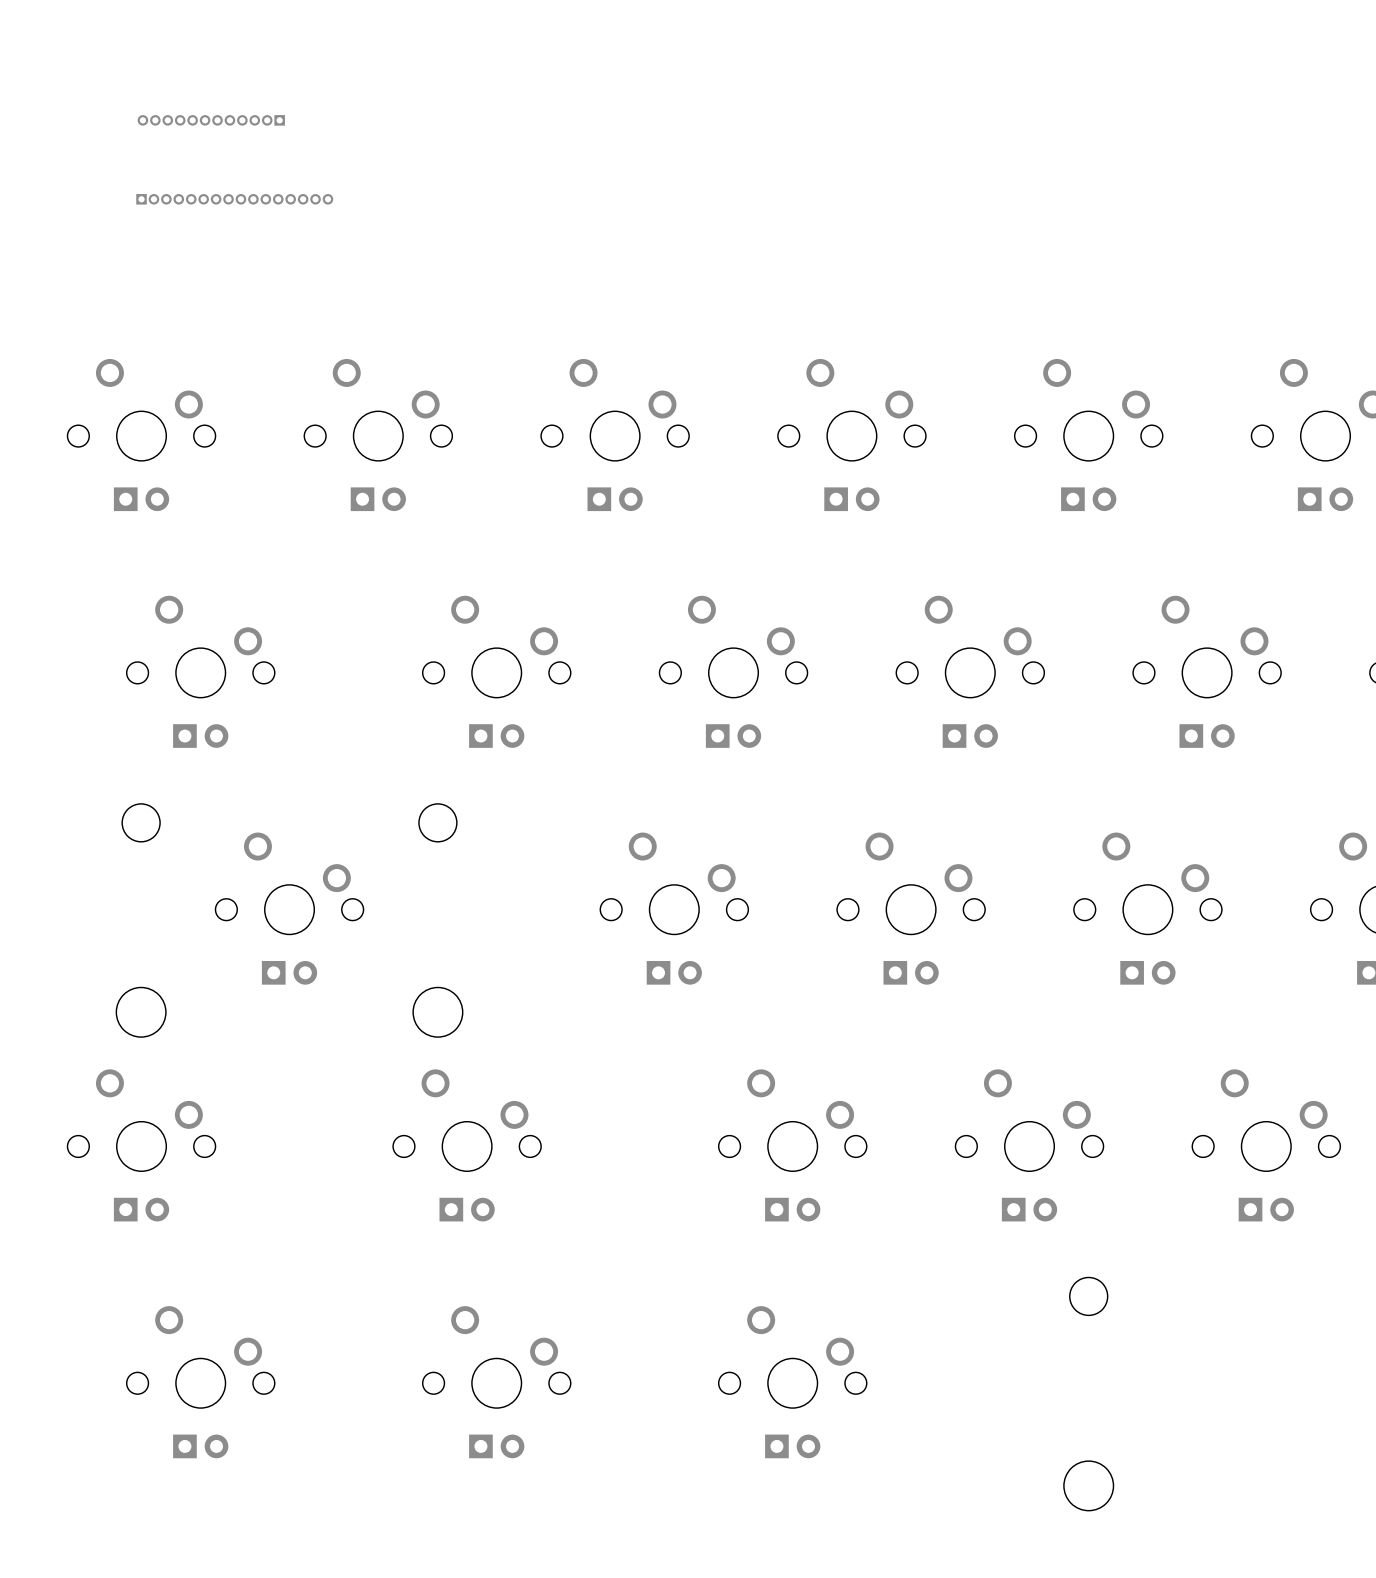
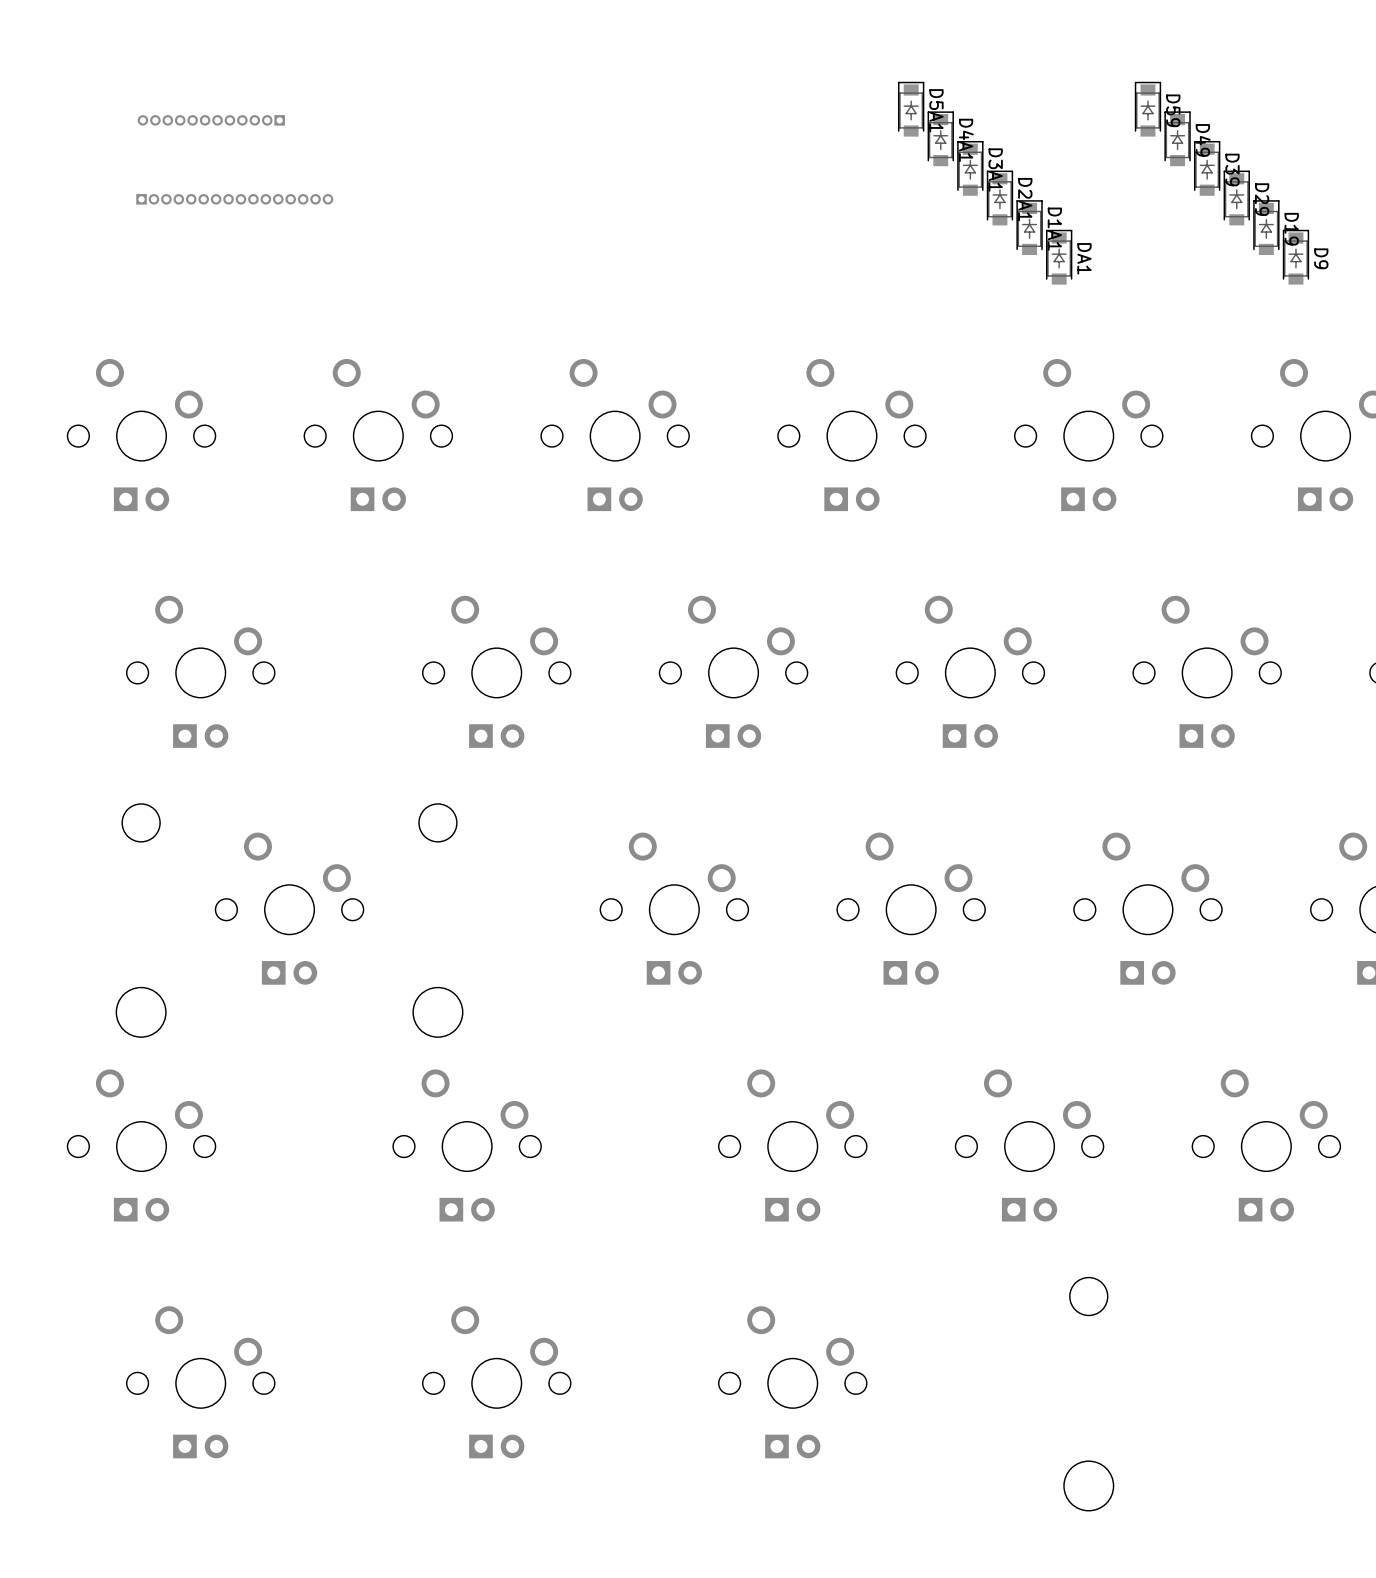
D5A1: none -> (911, 109)
D59: none -> (1147, 109)
D4A1: none -> (940, 138)
D49: none -> (1177, 138)
D3A1: none -> (970, 168)
D39: none -> (1207, 168)
D2A1: none -> (999, 198)
D29: none -> (1236, 198)
D1A1: none -> (1029, 227)
D19: none -> (1266, 227)
DA1: none -> (1059, 257)
D9: none -> (1295, 257)

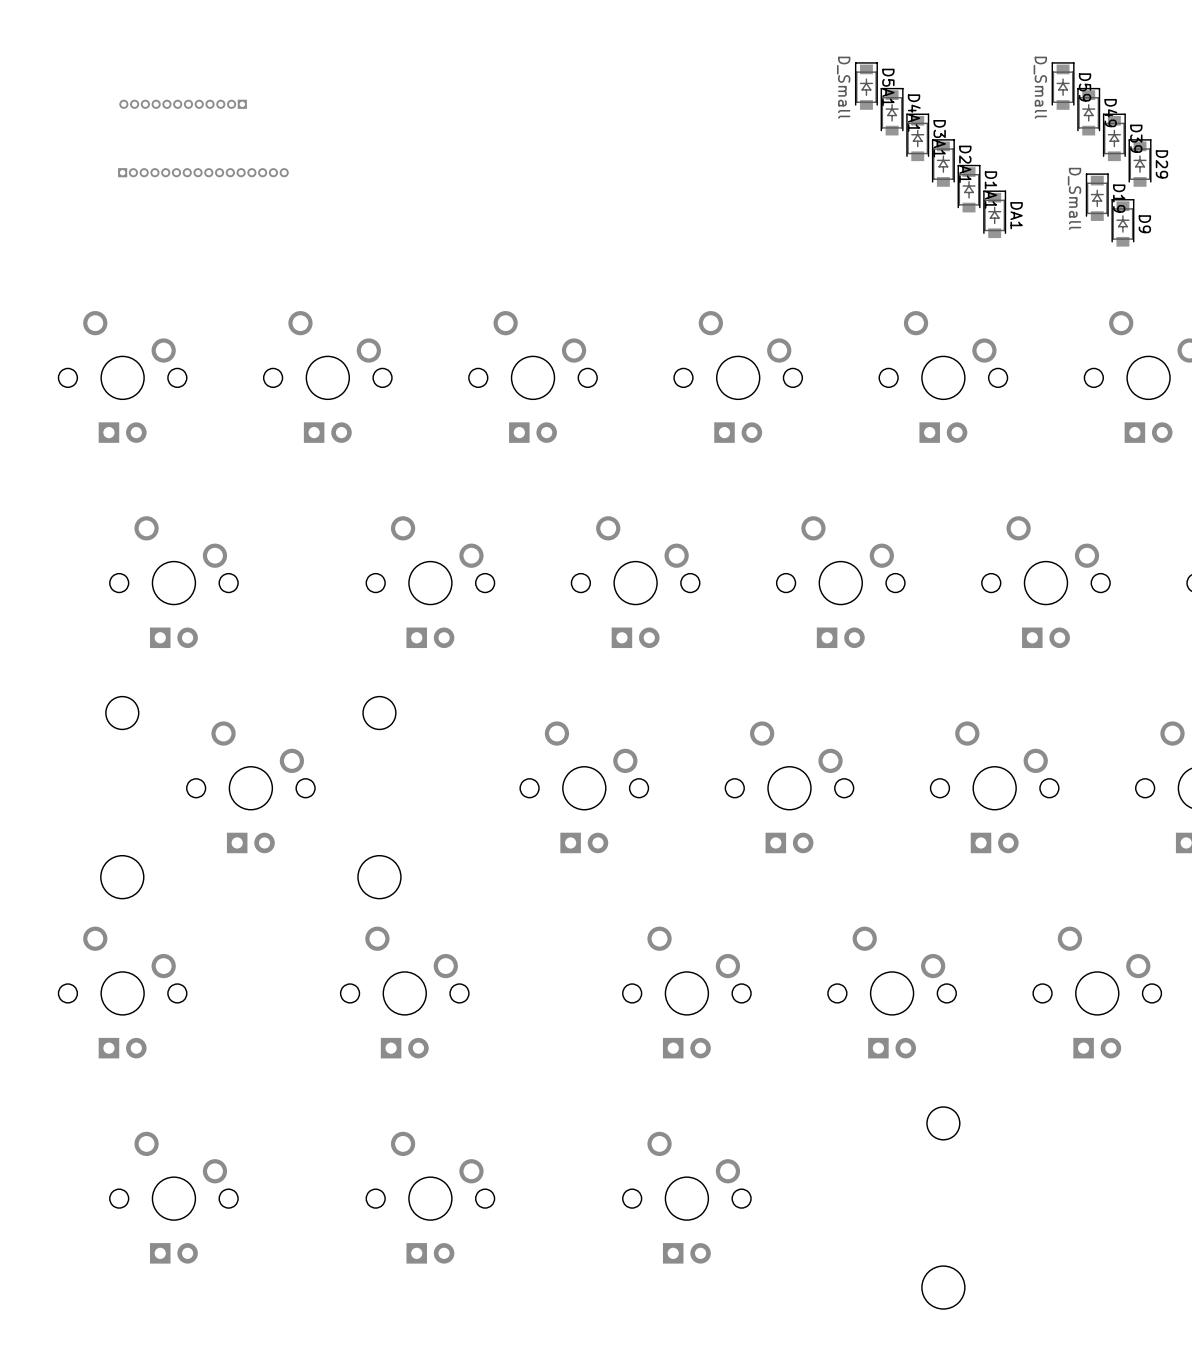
D5A1 value: none -> D_Small (843, 87)
D59 value: none -> D_Small (1040, 87)
D5A1 position: (911, 109) -> (866, 86)
D59 position: (1147, 109) -> (1063, 86)
D4A1 position: (940, 138) -> (892, 111)
D49 position: (1177, 138) -> (1088, 111)
D3A1 position: (970, 168) -> (917, 137)
D39 position: (1207, 168) -> (1114, 137)
D2A1 position: (999, 198) -> (943, 163)
D29 position: (1236, 198) -> (1140, 163)
D1A1 position: (1029, 227) -> (969, 188)
D19 value: none -> D_Small (1074, 198)
DA1 position: (1059, 257) -> (994, 214)

